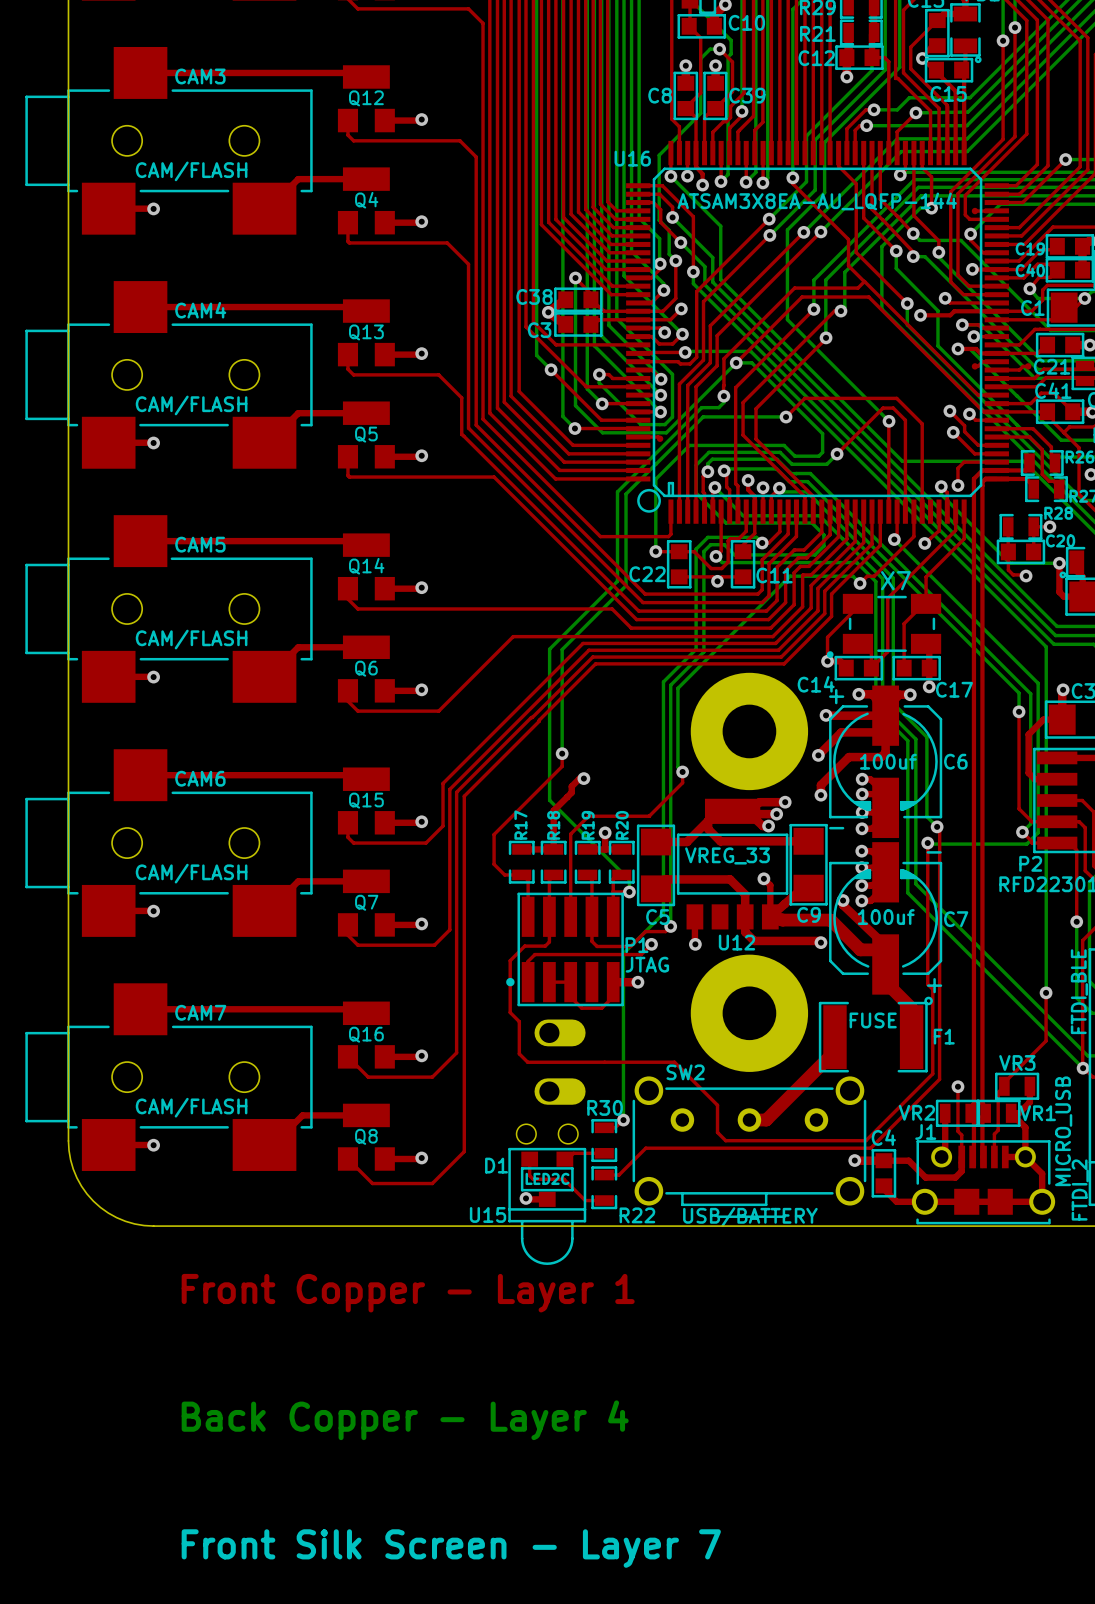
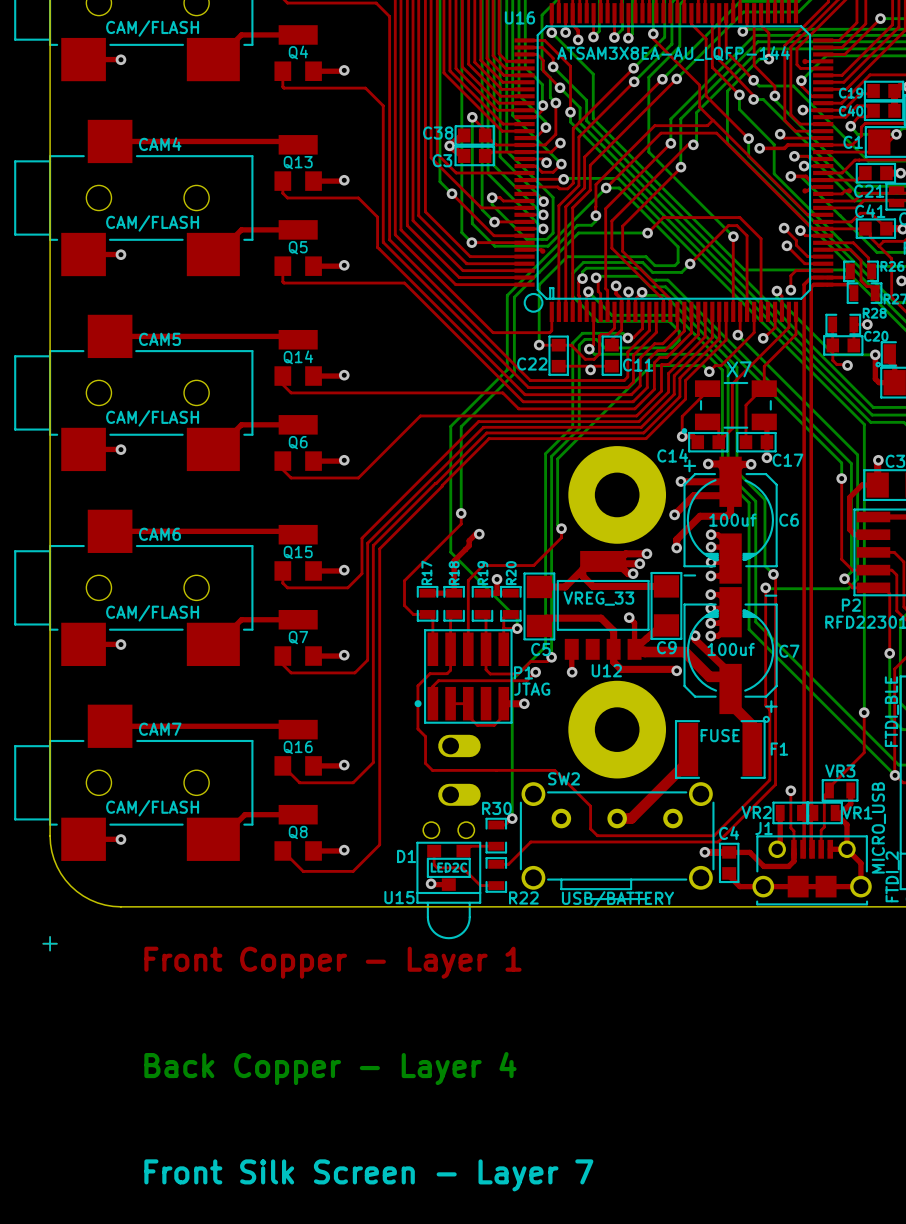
text: none -> + (50, 943)

